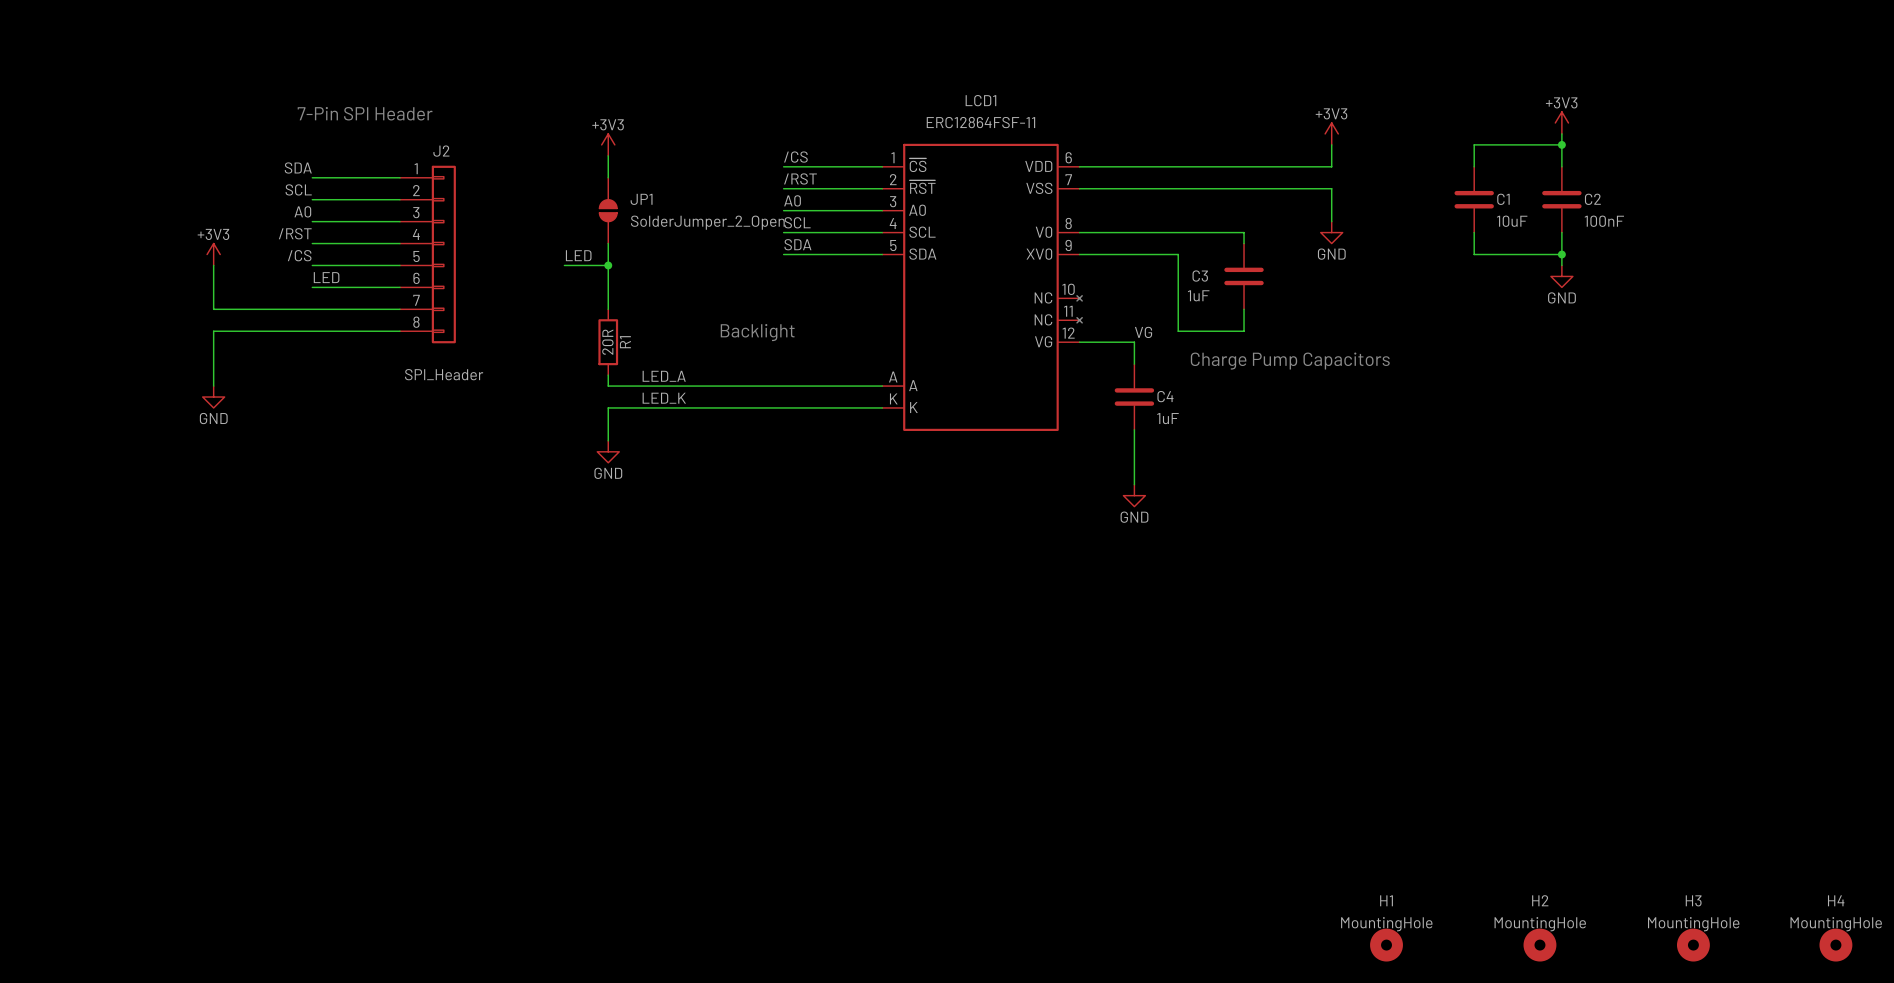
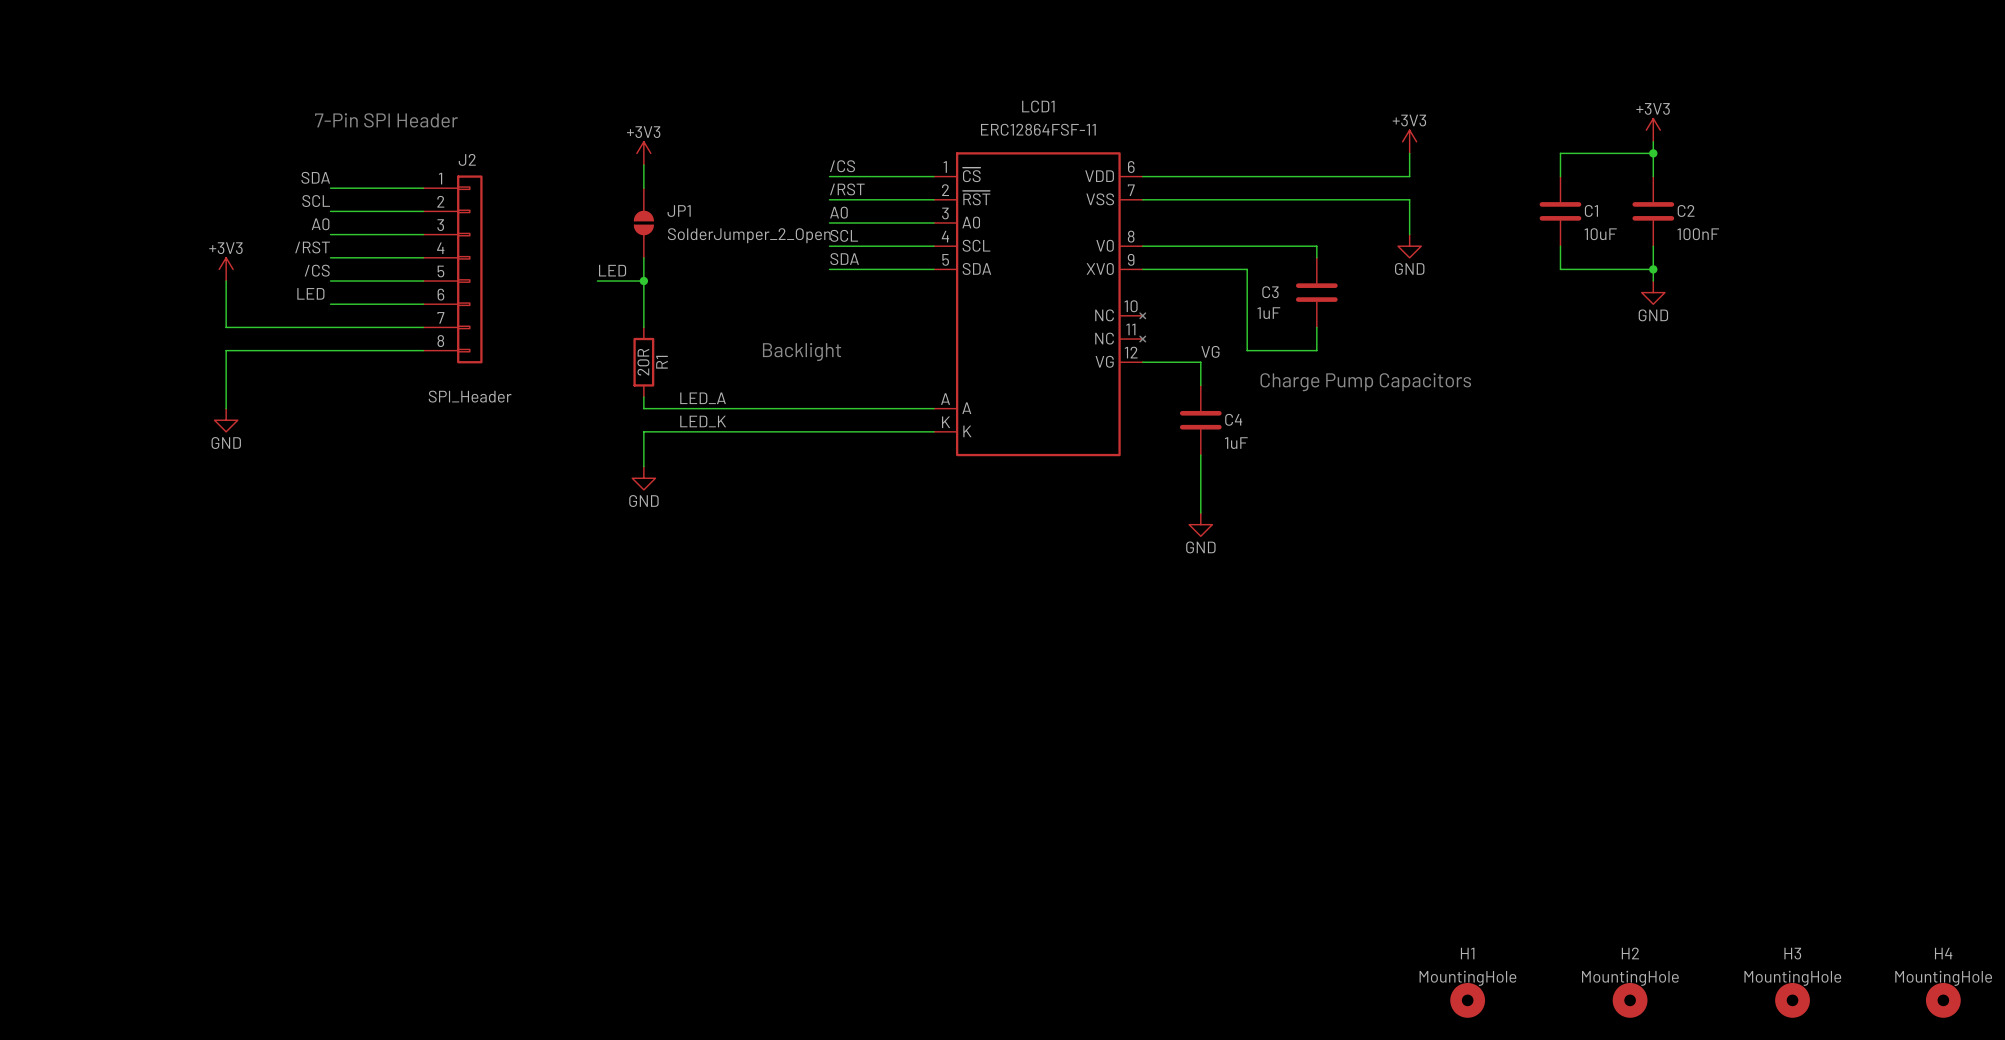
label position: LED (326, 277) -> LED (310, 293)

